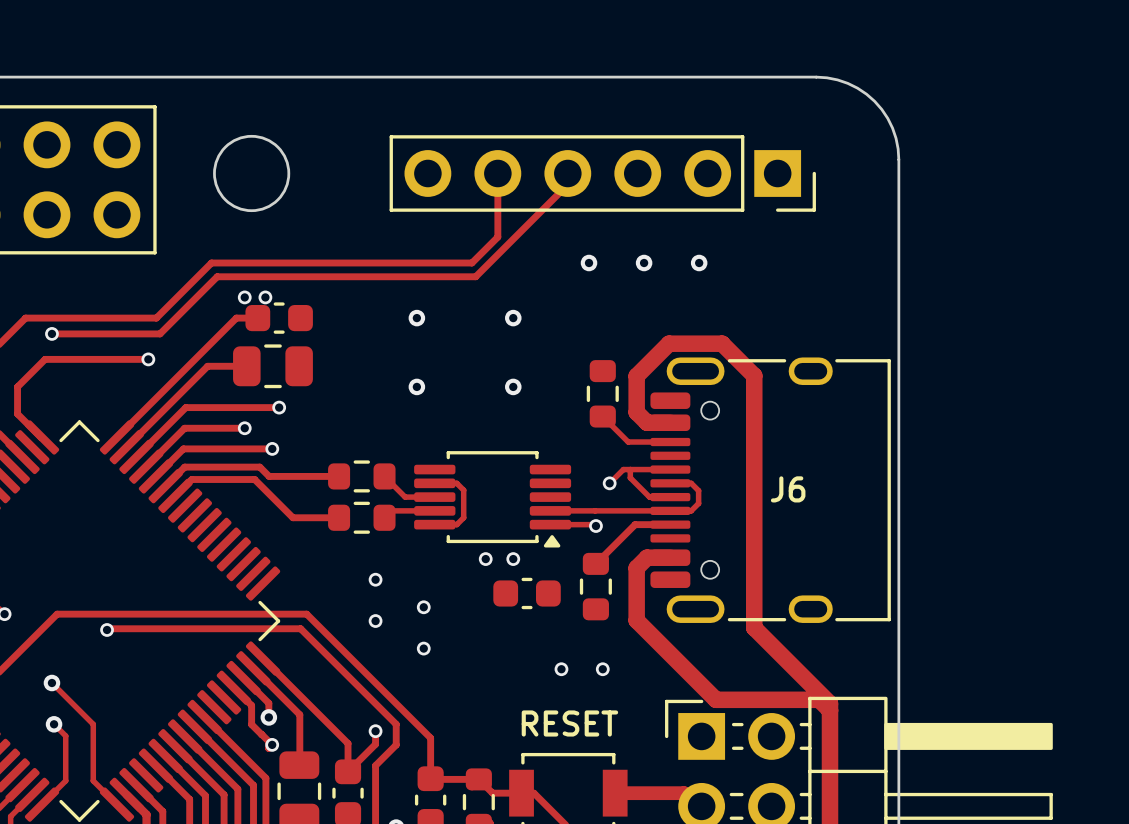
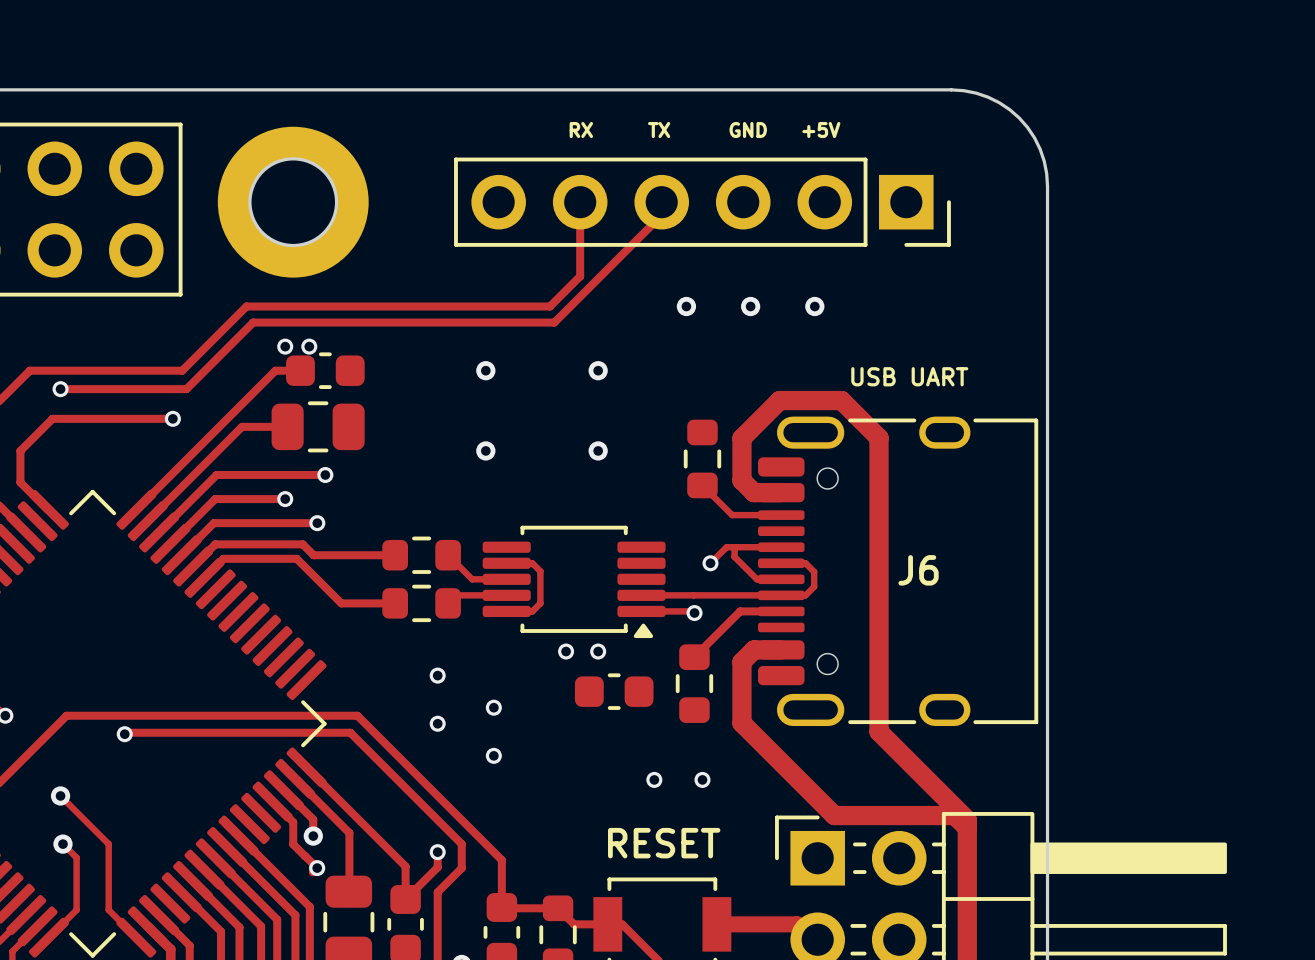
text: none -> RX (581, 130)
text: none -> TX (659, 130)
text: none -> GND (748, 130)
text: none -> +5V (821, 130)
part: none -> (293, 202)
text: none -> USB UART (909, 376)

